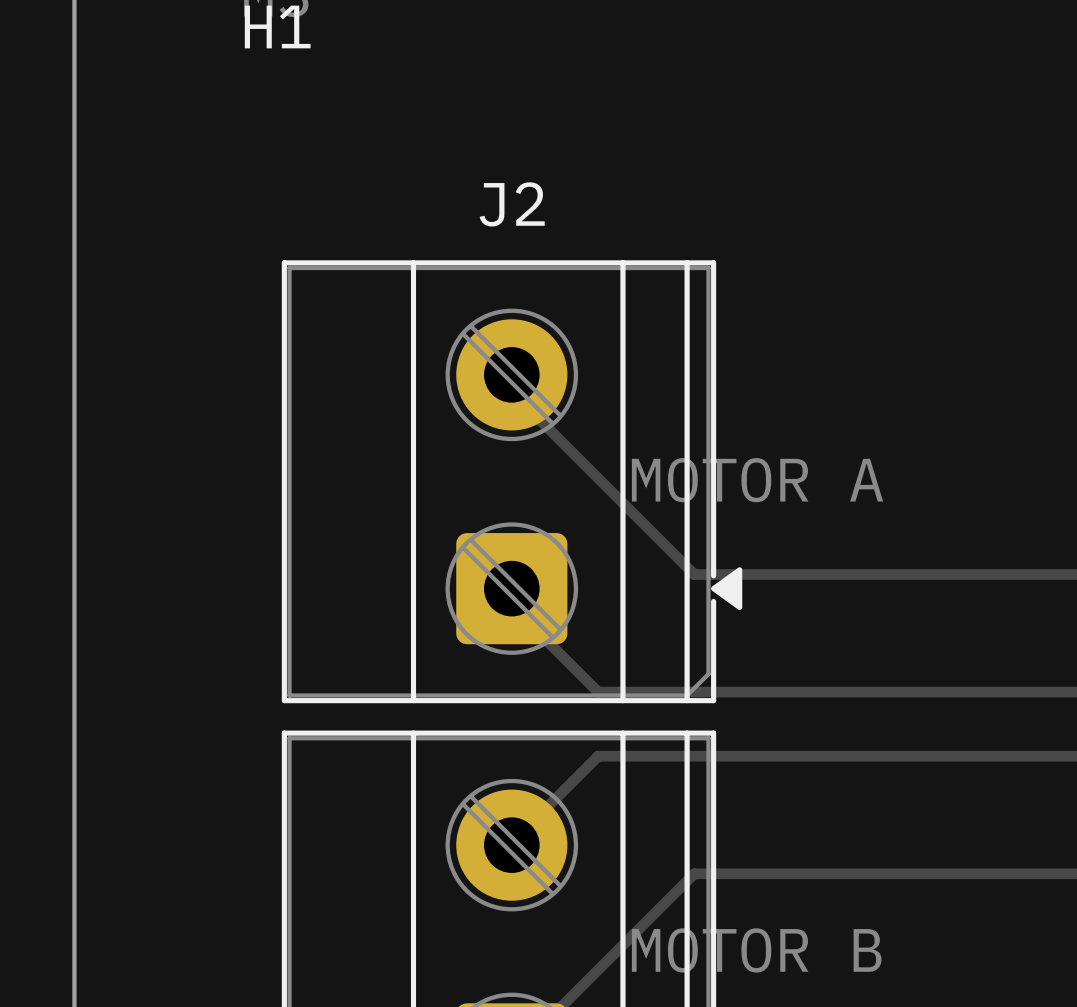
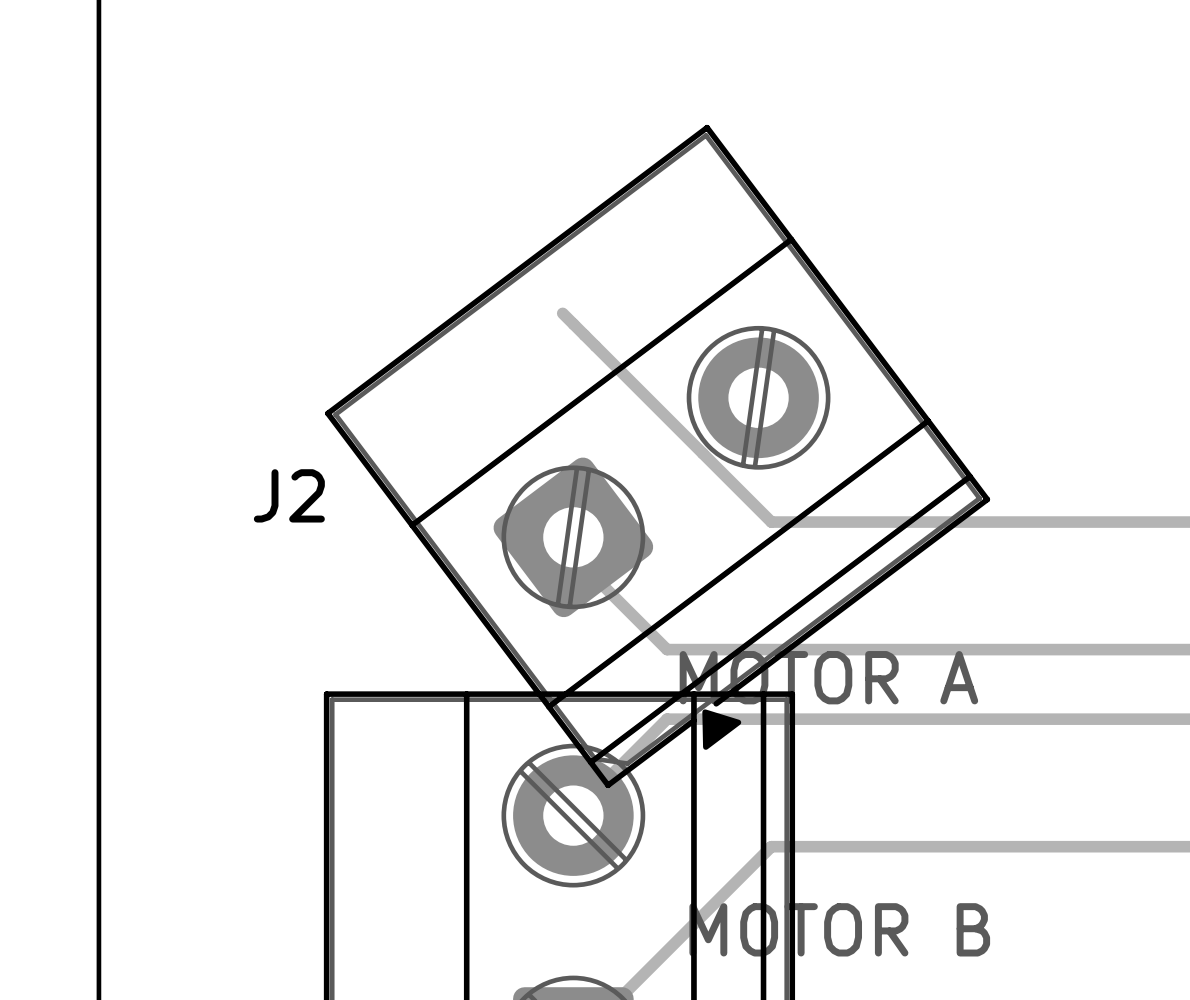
J2 name position: J2 (512, 204) -> J2 (289, 495)
J2 rotation: 0° (512, 481) -> 53° clockwise (657, 456)

